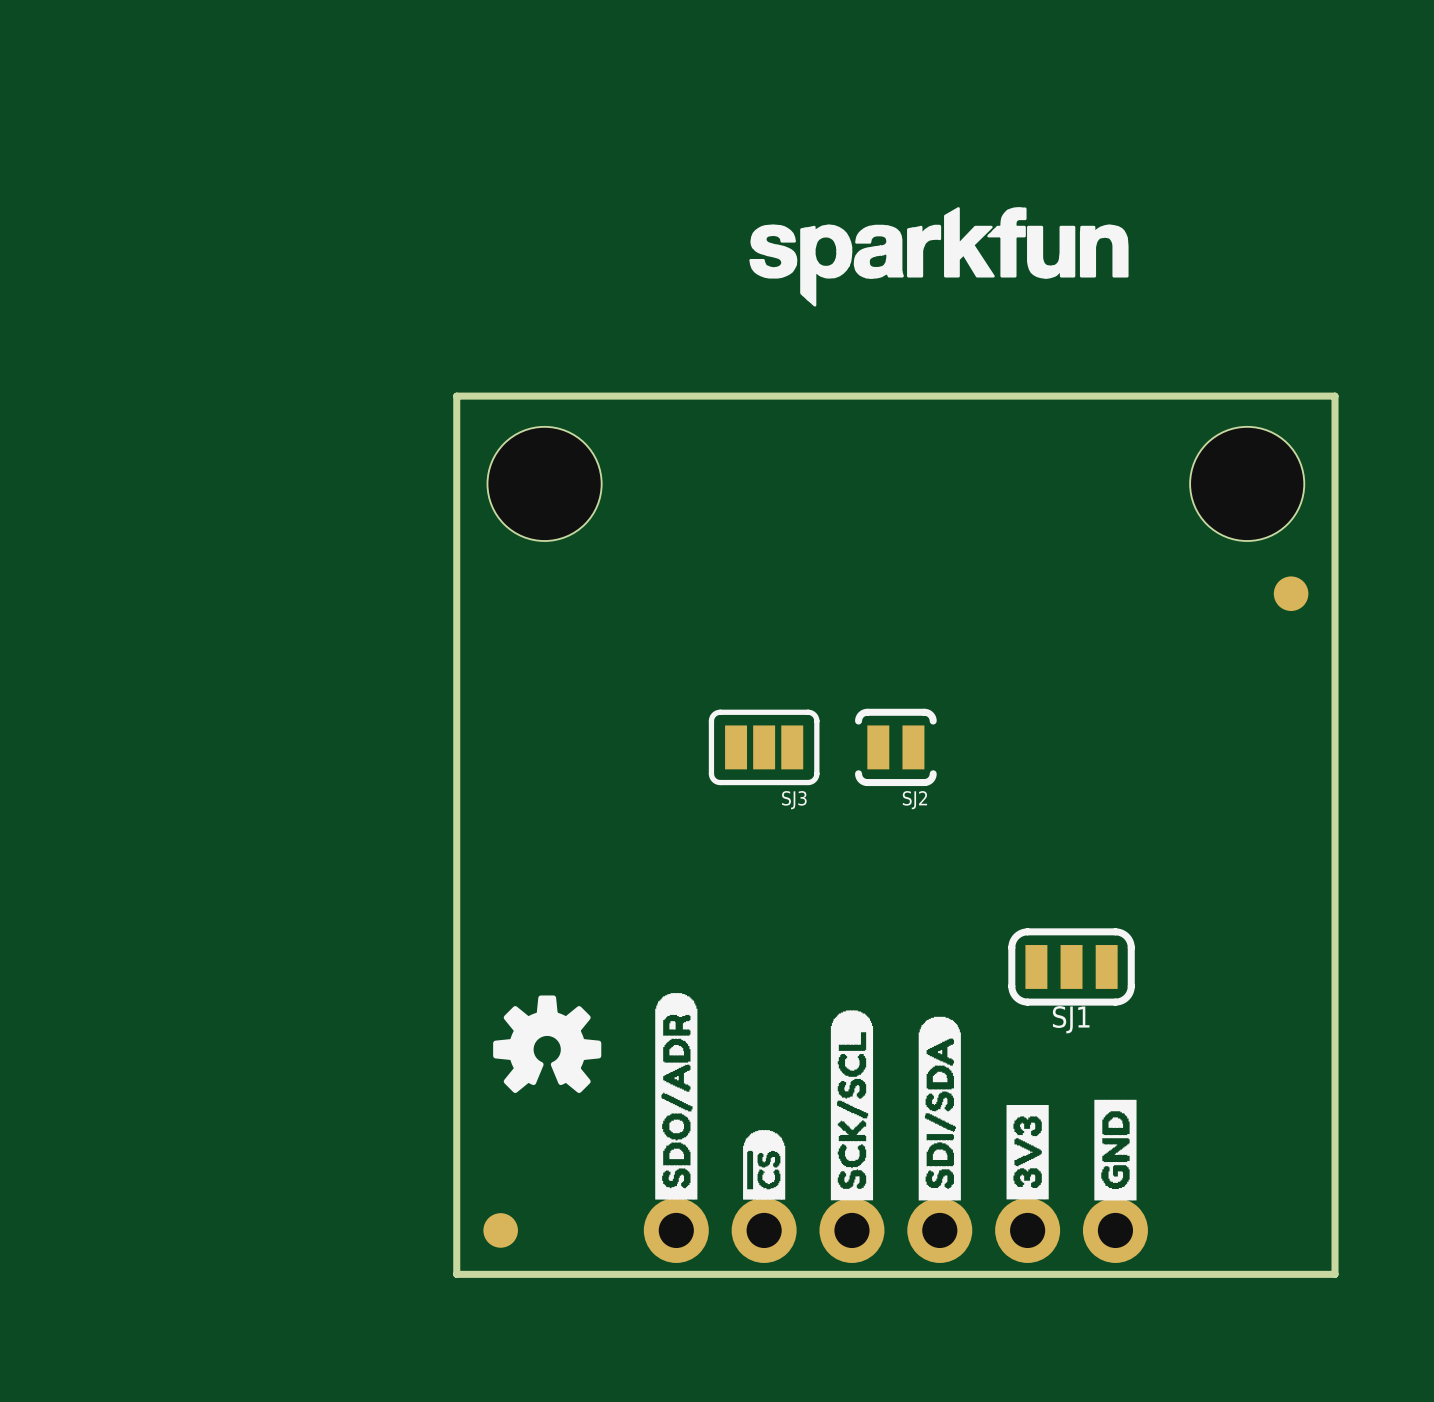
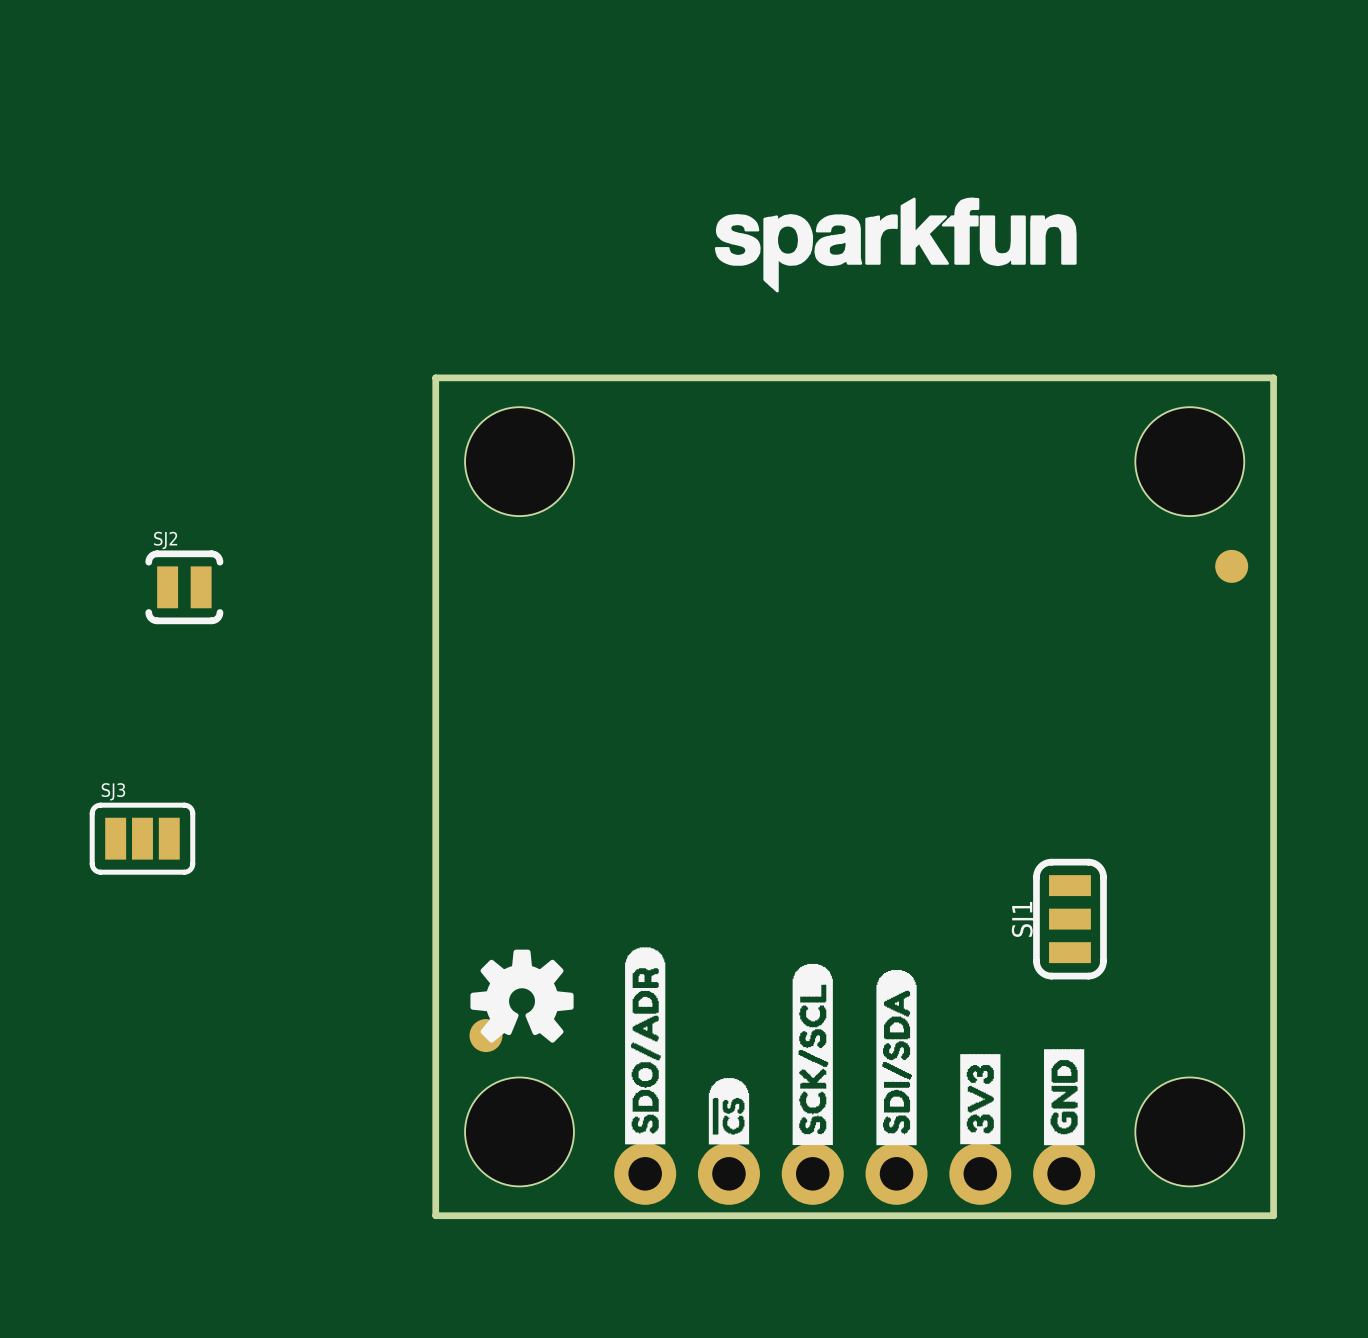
SJ3 position: (764, 747) -> (142, 838)
SJ2 position: (895, 747) -> (184, 587)
SJ3 name position: SJ3 (794, 800) -> SJ3 (113, 791)
SJ2 name position: SJ2 (914, 800) -> SJ2 (165, 540)
SJ1 rotation: 0° (1071, 966) -> 90° clockwise (1069, 919)
part: none -> (519, 1131)
part: none -> (1189, 1131)
part position: (500, 1230) -> (485, 1035)

